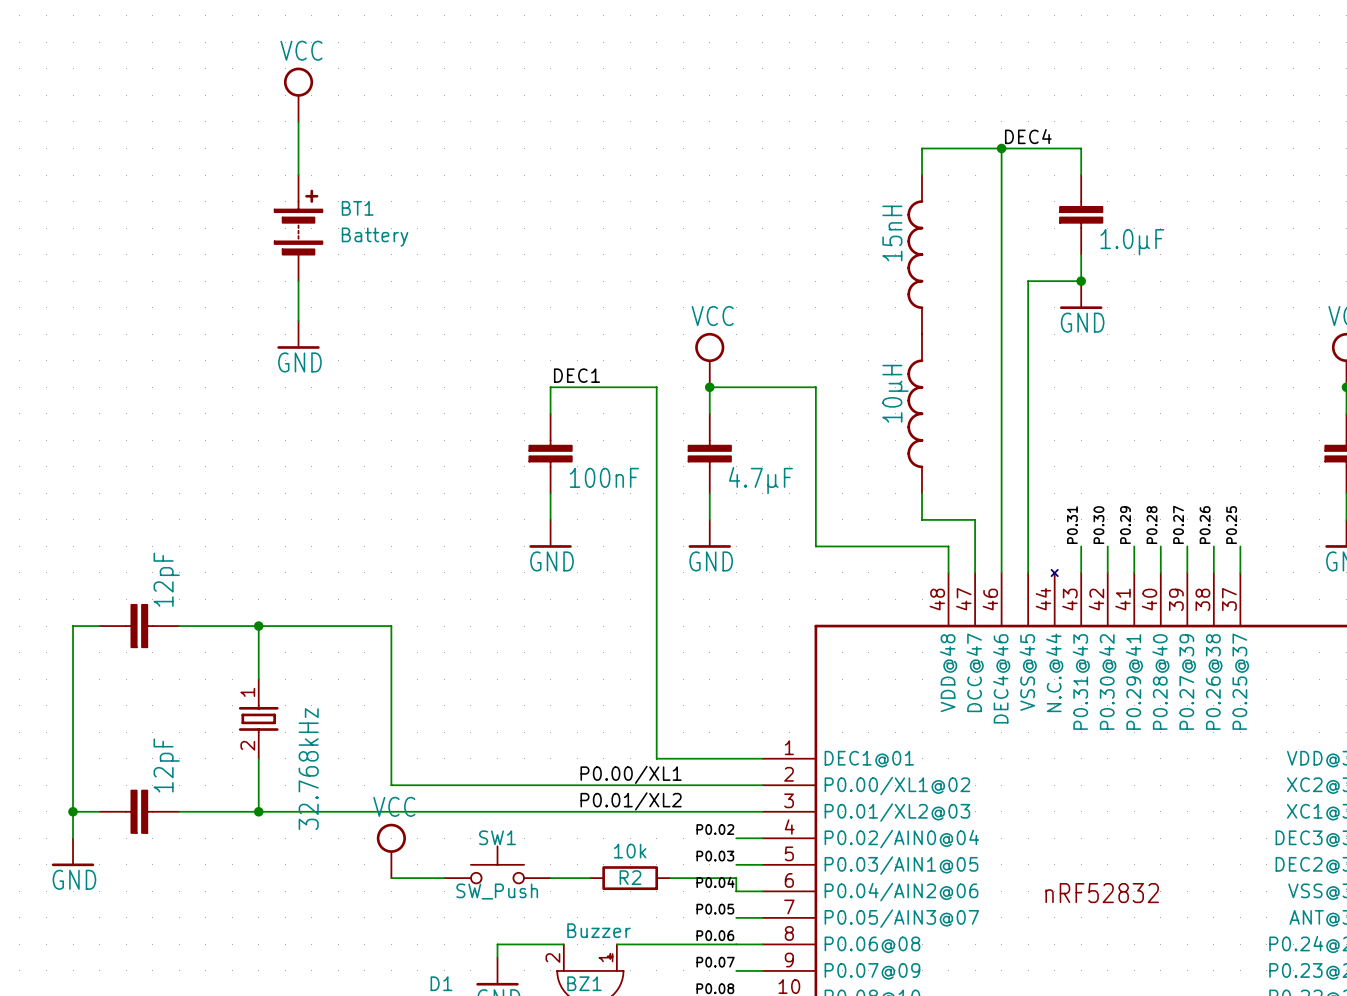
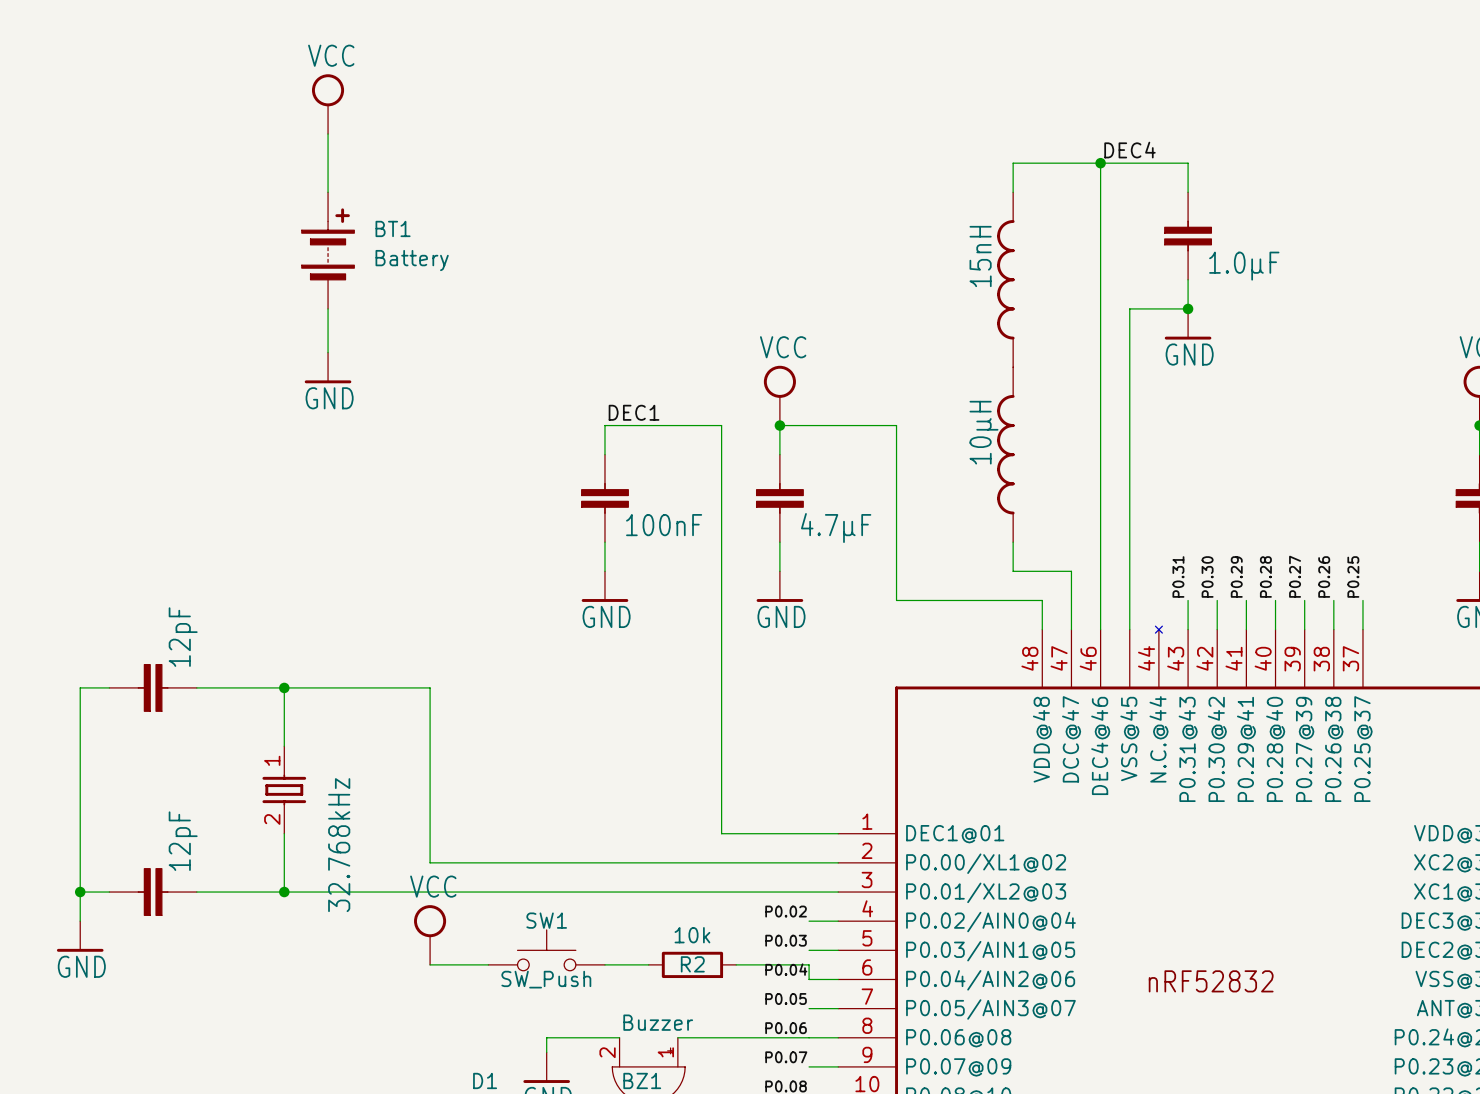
label: P0.00/XL1 (631, 774) -> none
label: P0.01/XL2 (631, 801) -> none

